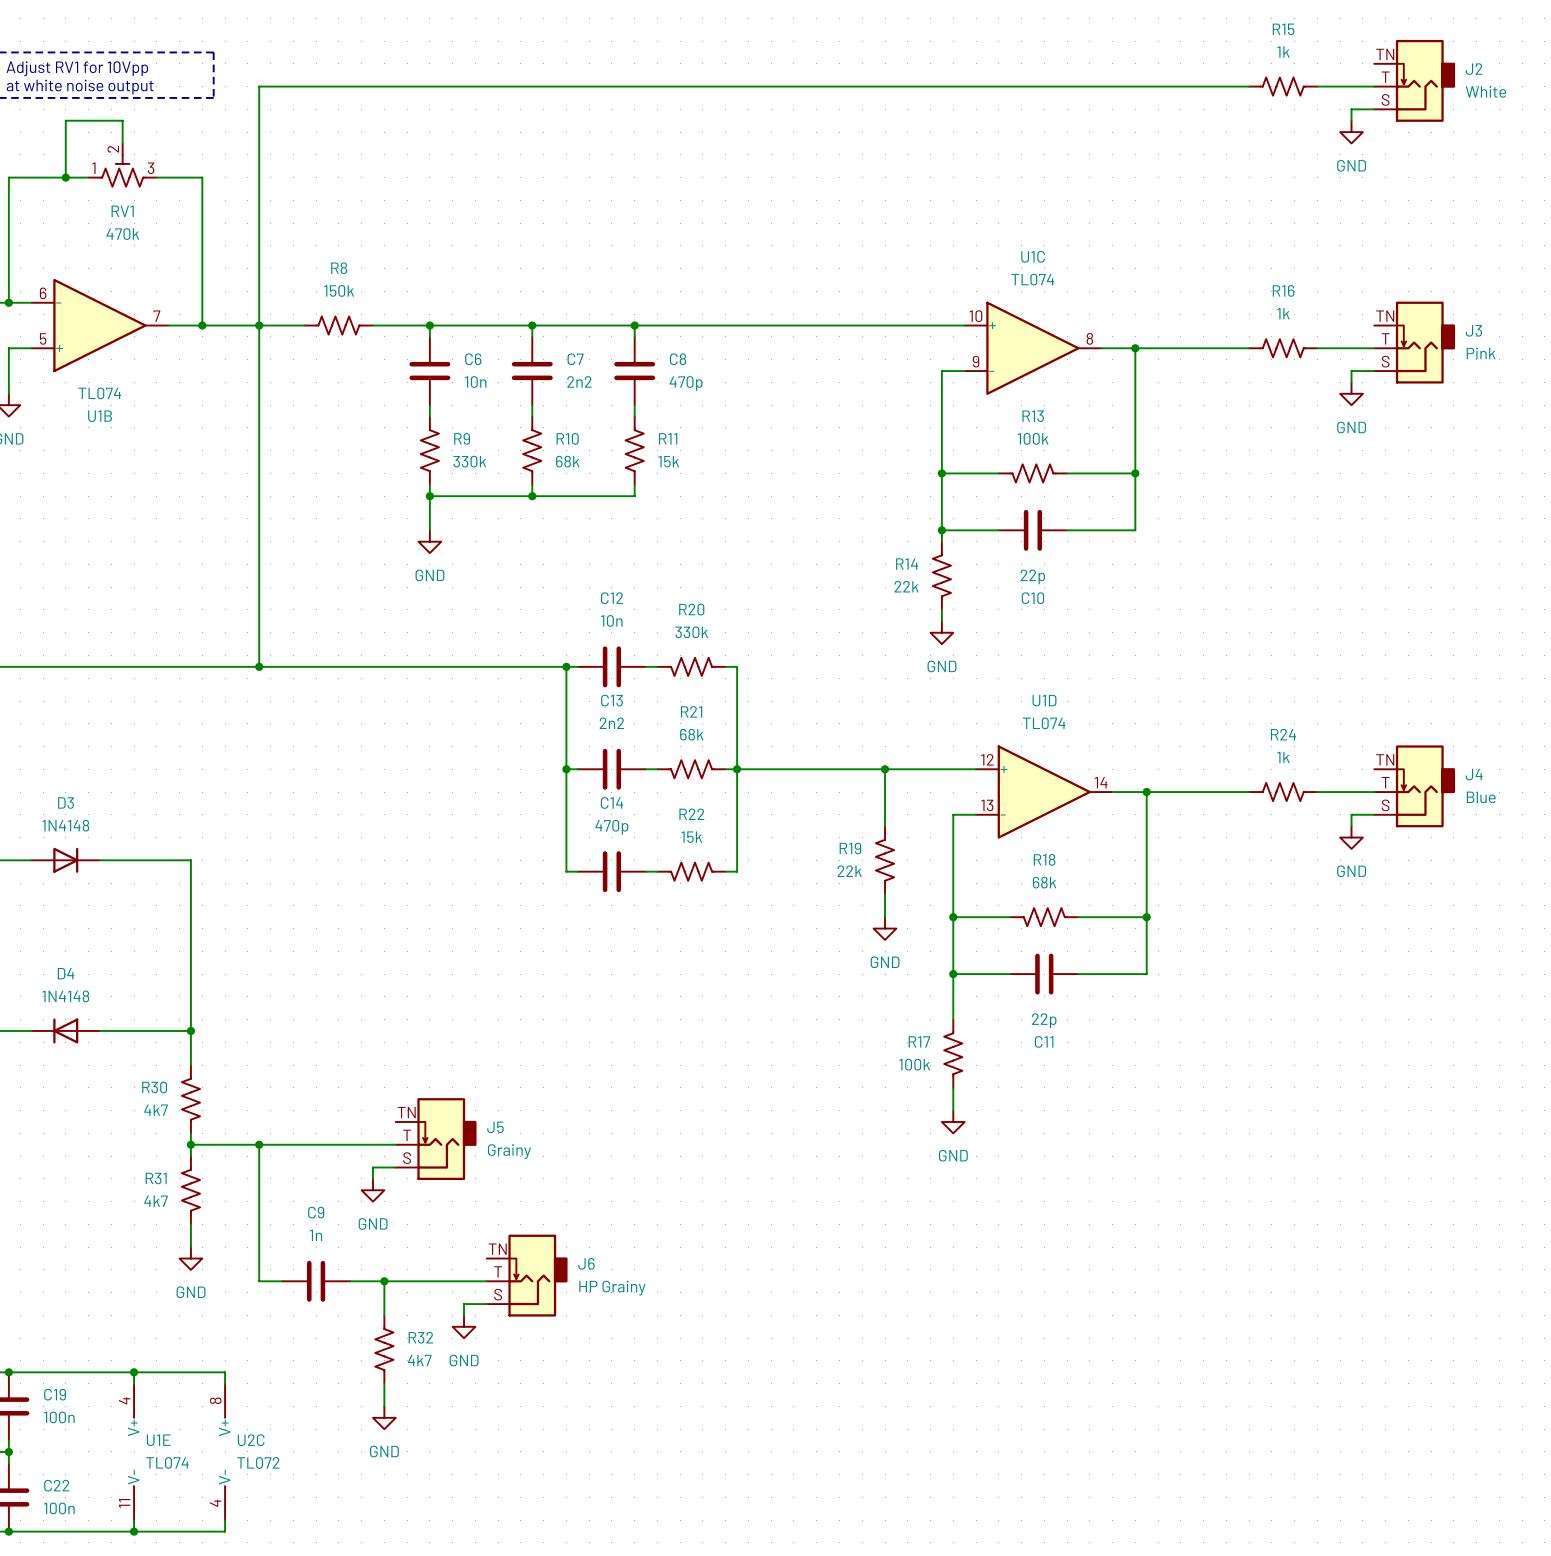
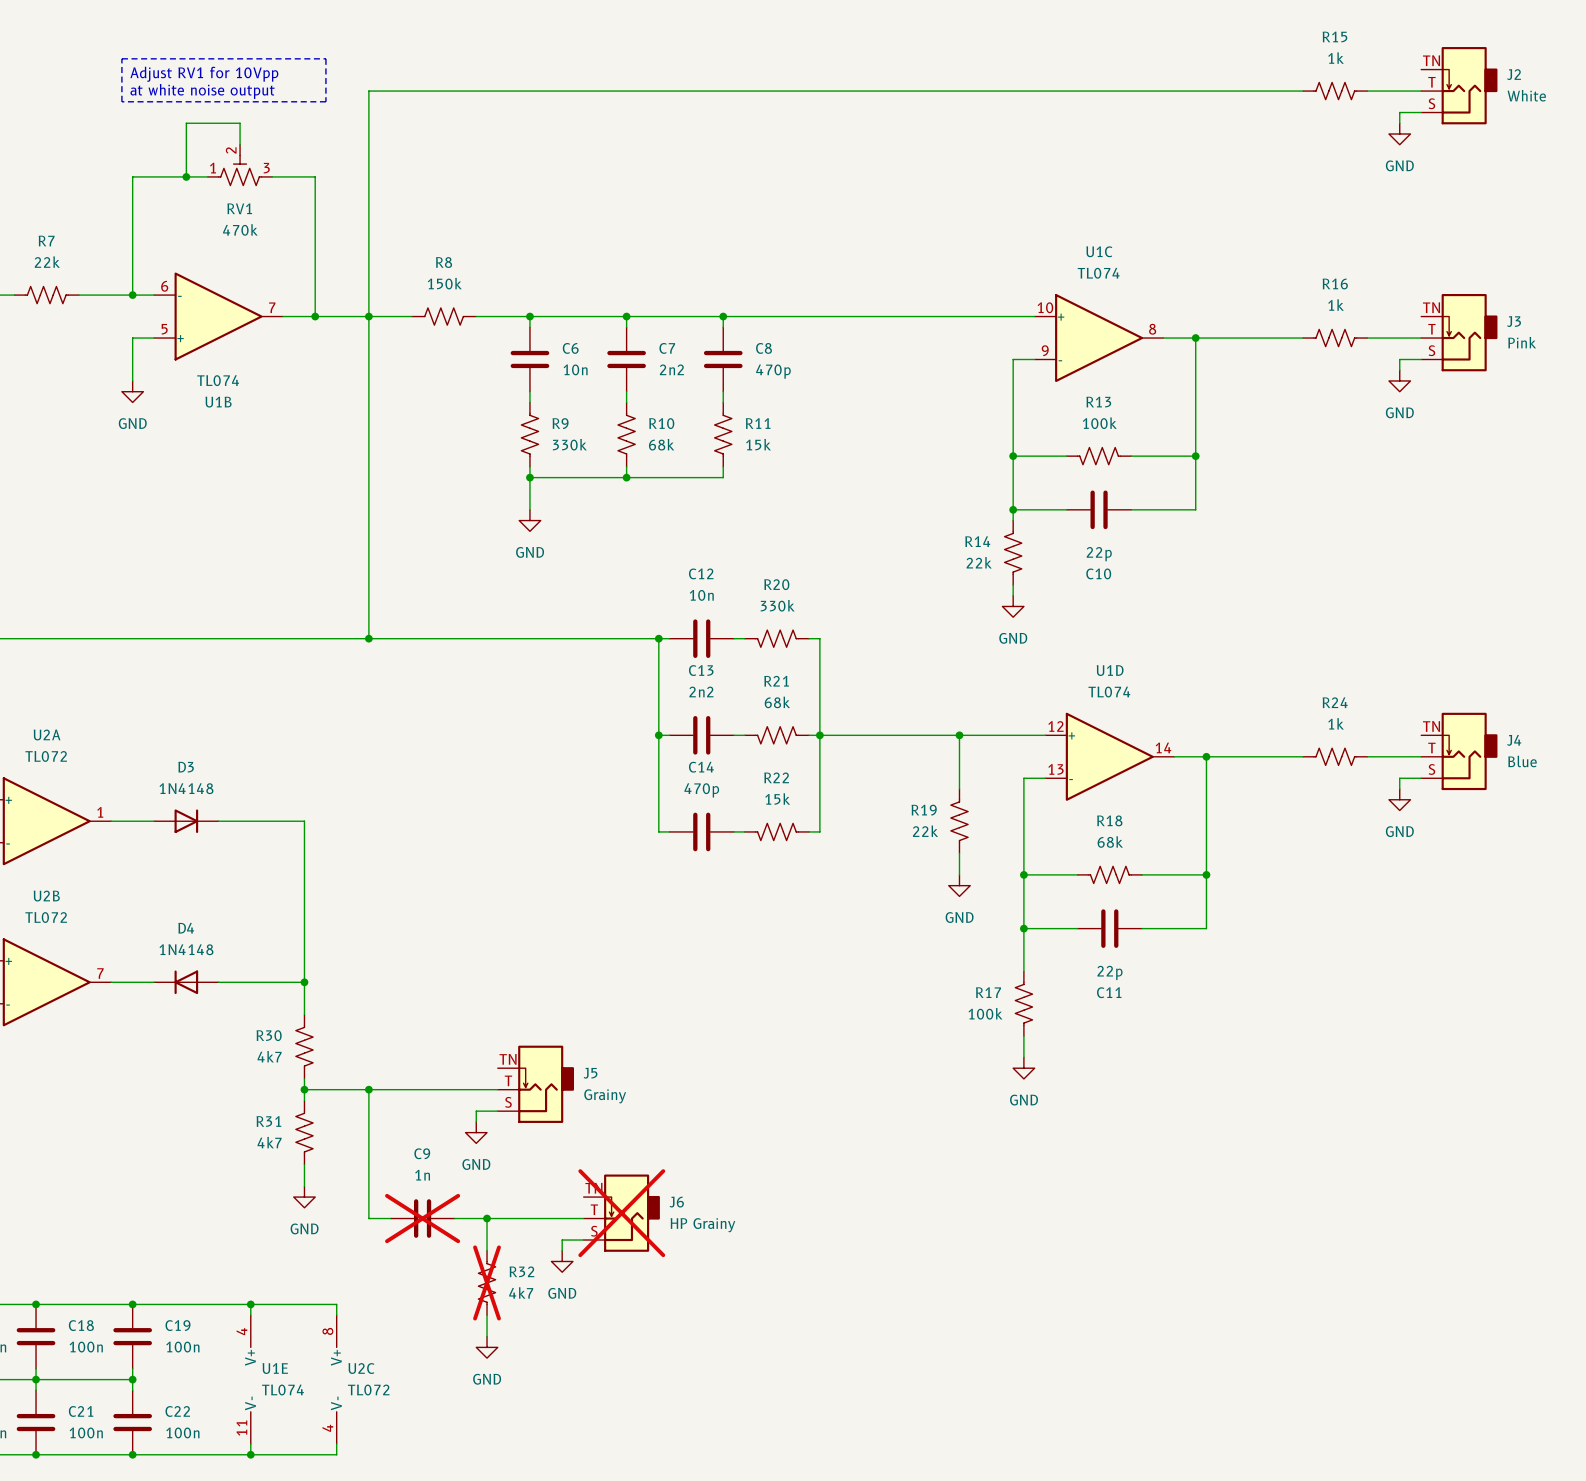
J6 do-not-place cross: none -> (621, 1213)
C9 do-not-place cross: none -> (422, 1218)
R32 do-not-place cross: none -> (487, 1282)

